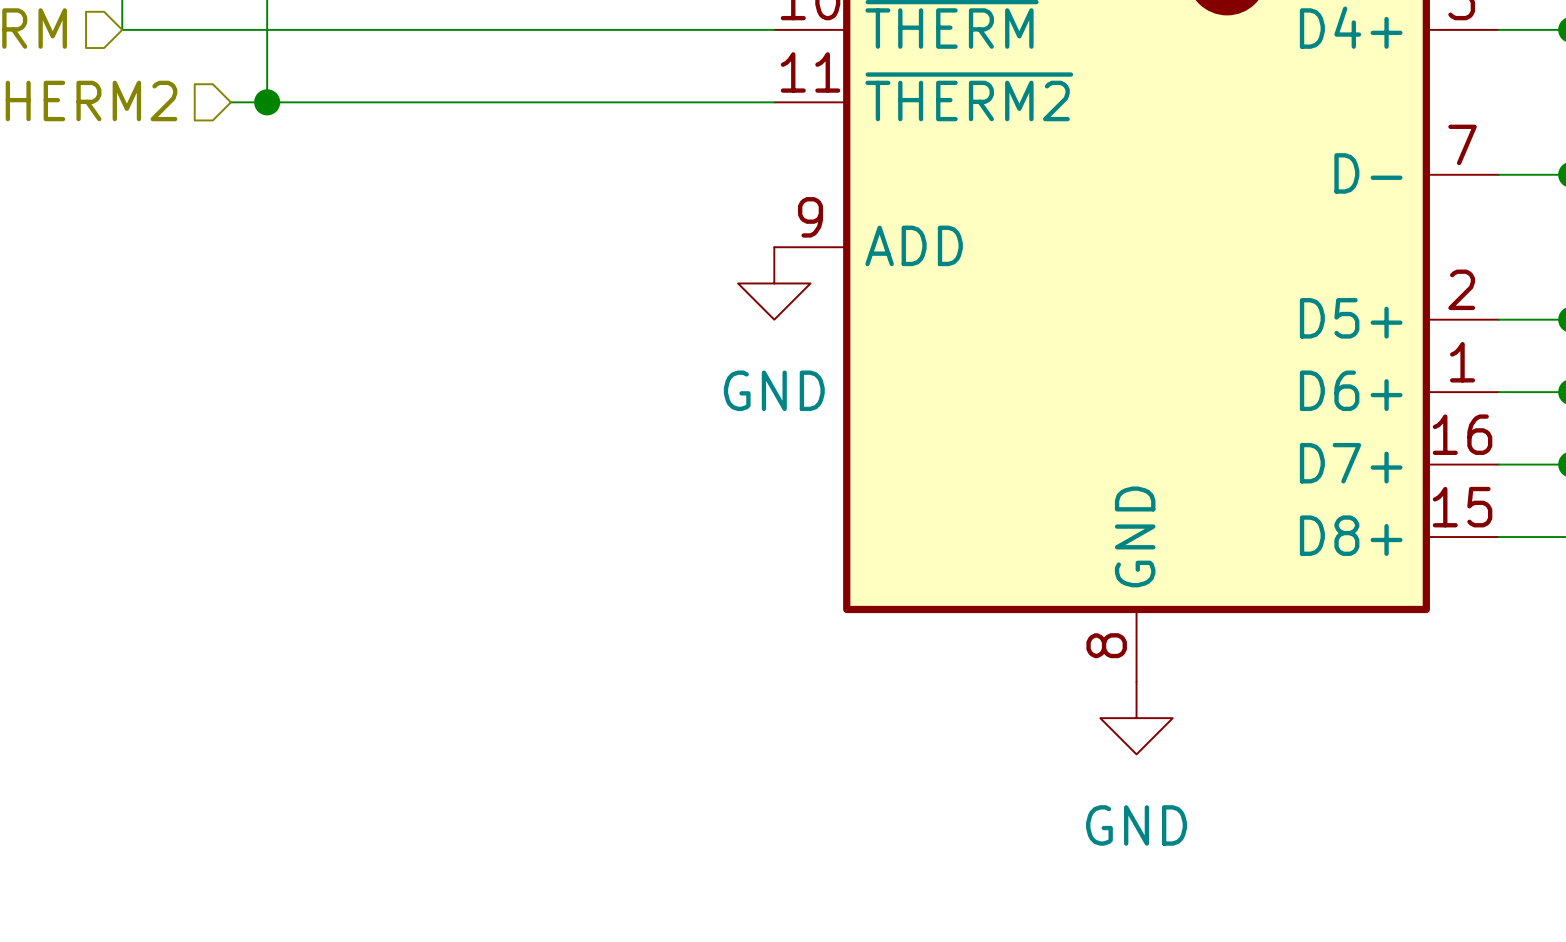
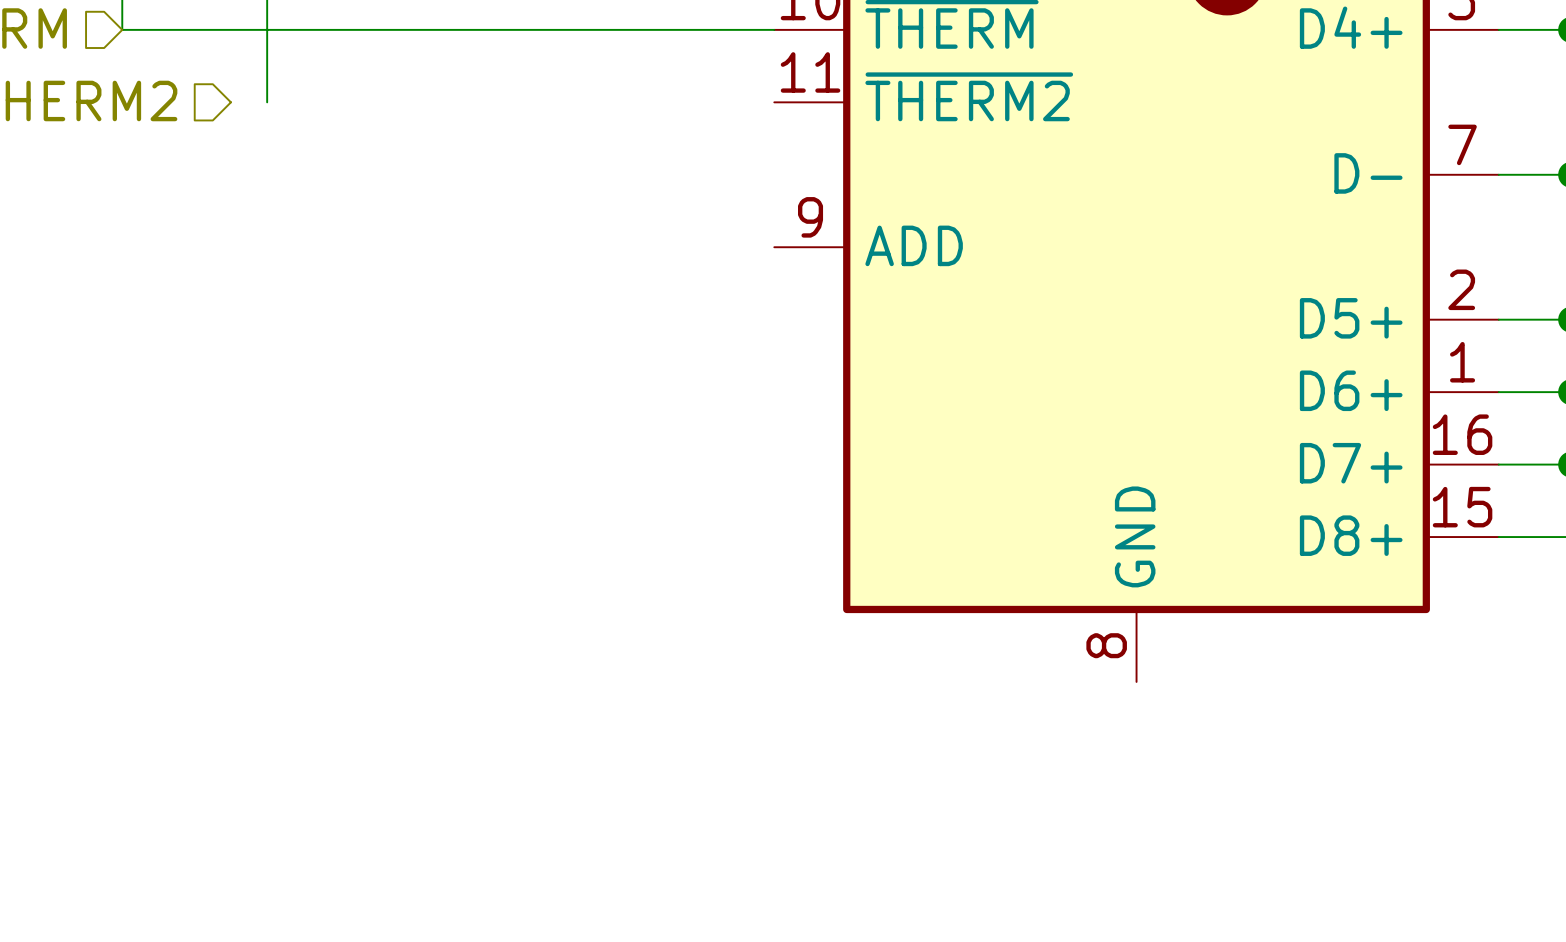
wire: (230, 102) (774, 102) -> none
junction: (267, 102) -> none
power symbol: GND (774, 283) -> none
power symbol: GND (1136, 718) -> none

